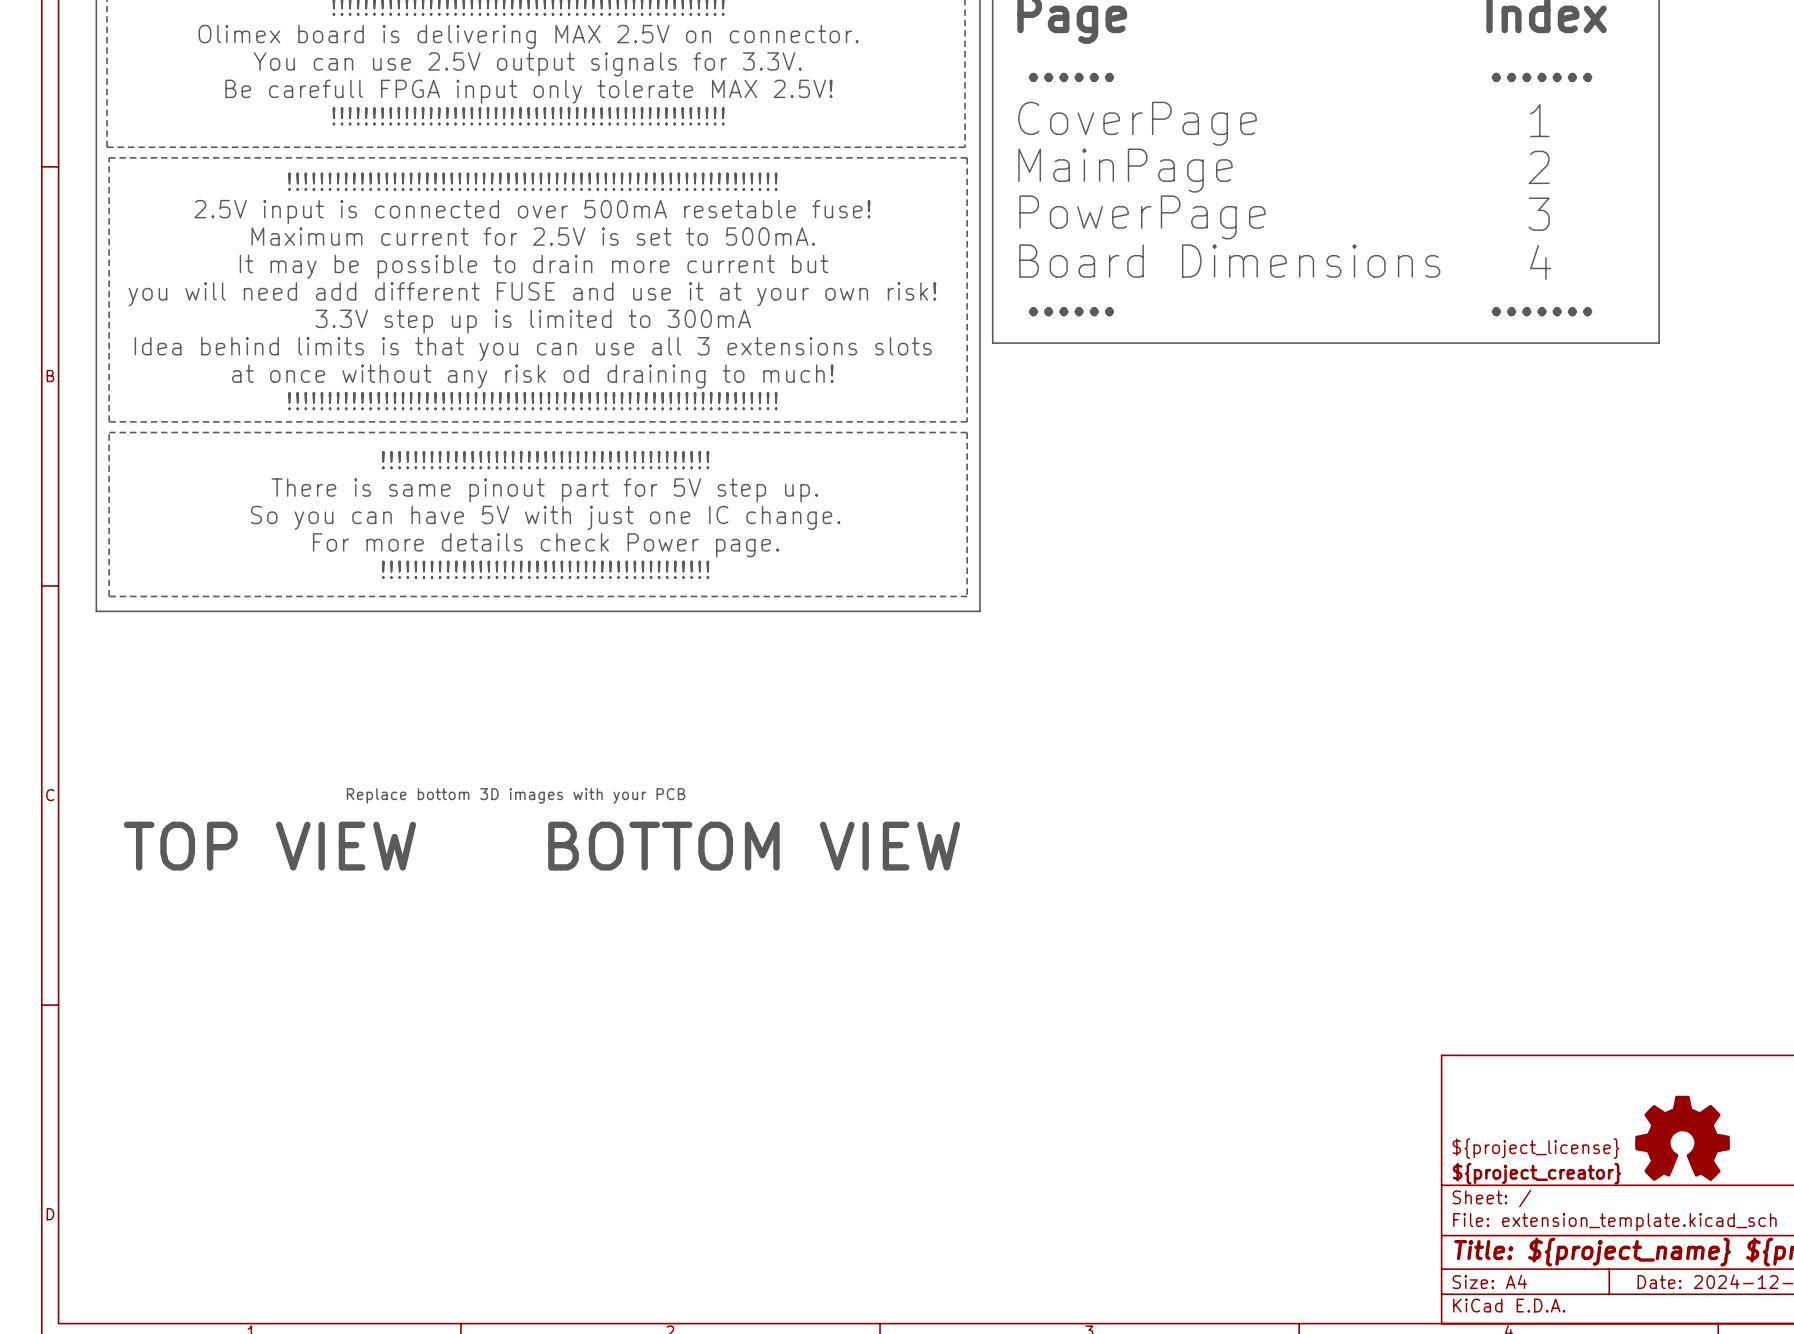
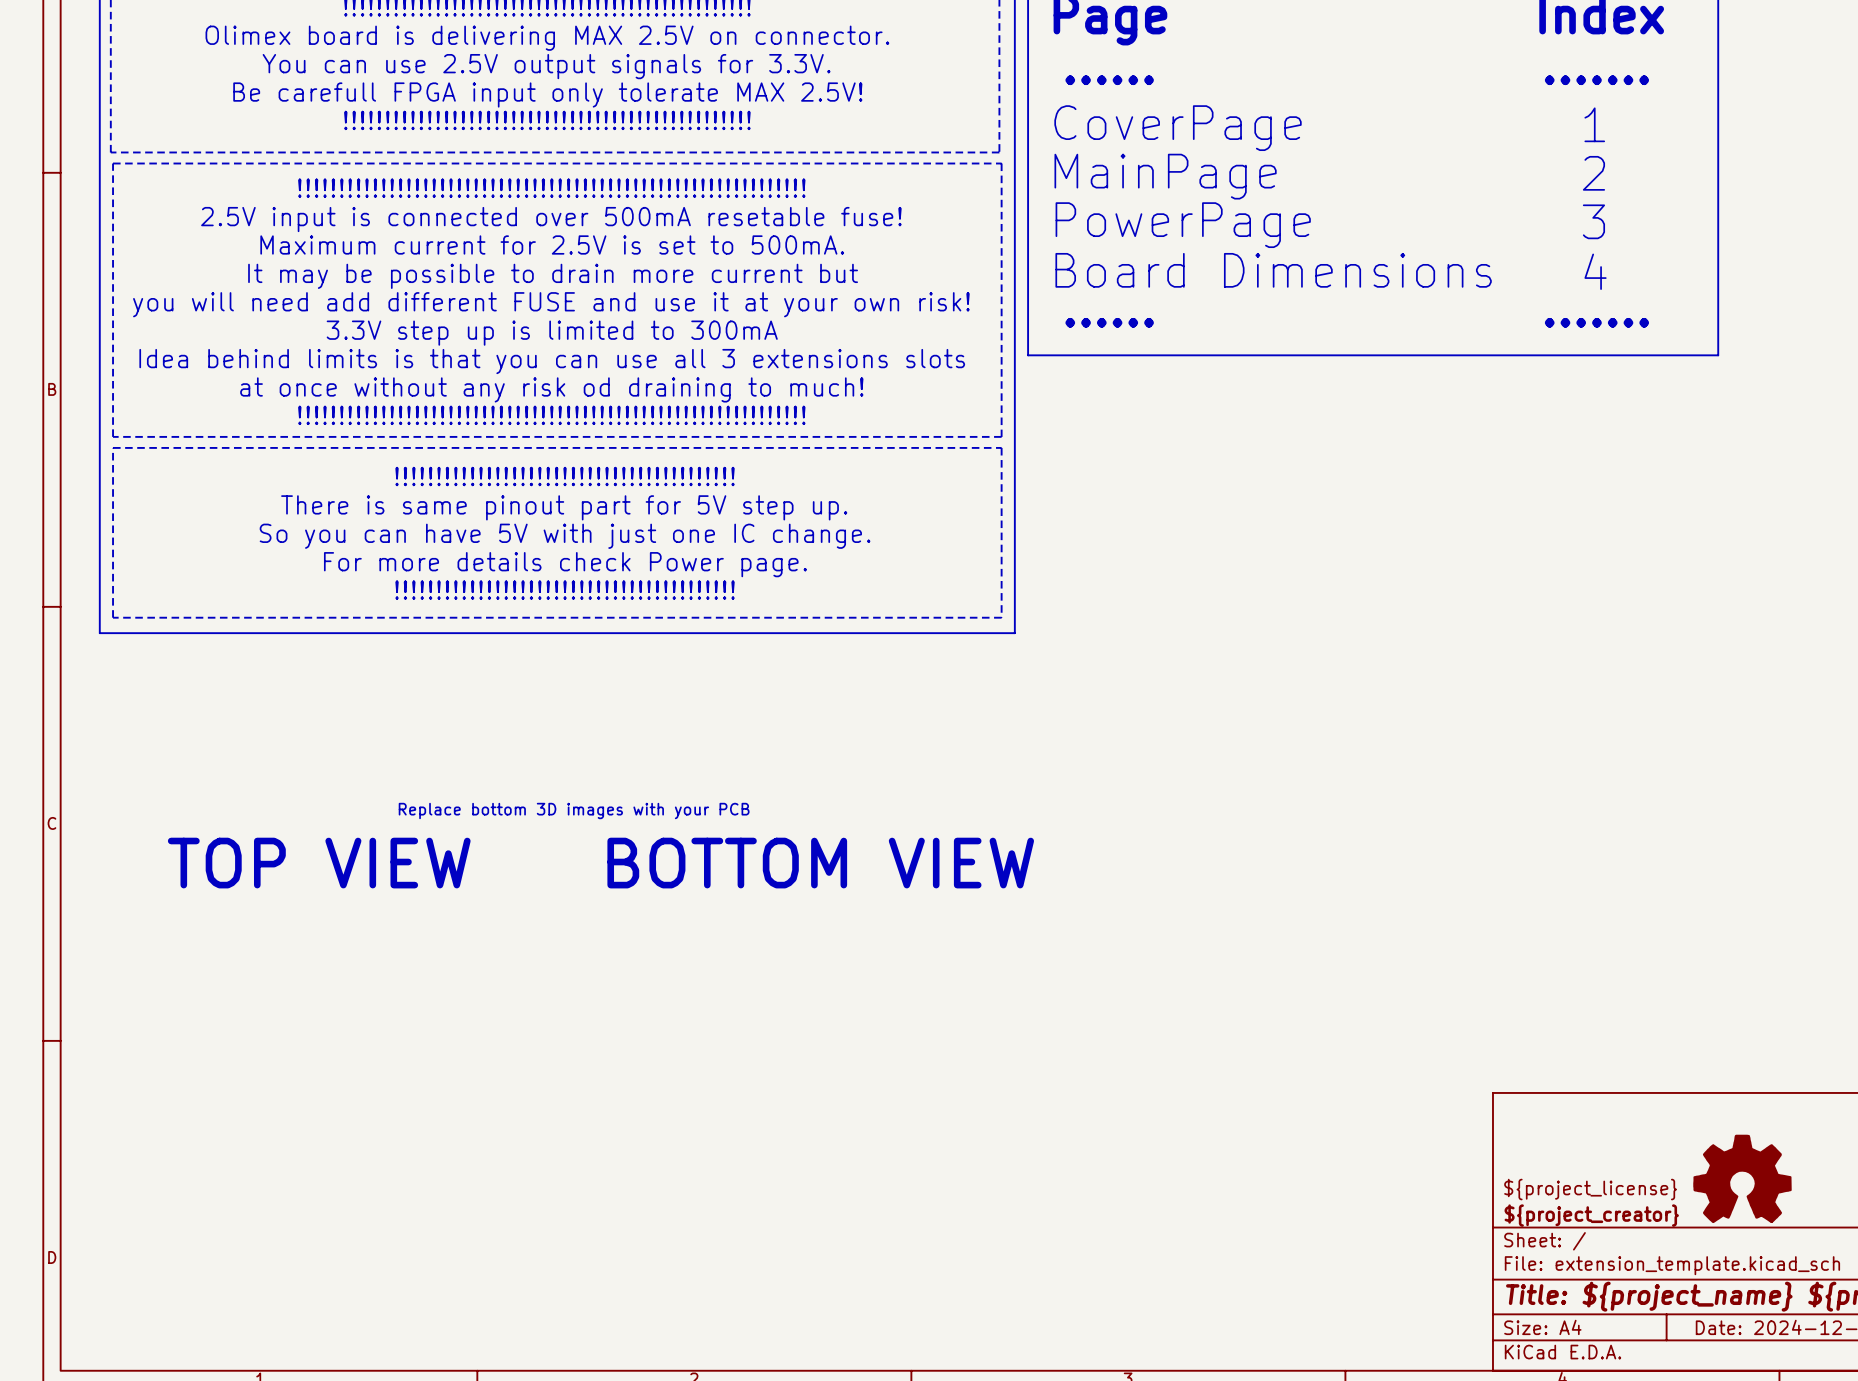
text position: Replace bottom 3D images with your PCB (516, 795) -> Replace bottom 3D images with your PCB (574, 811)
text position: TOP VIEW (269, 846) -> TOP VIEW (319, 863)
text position: BOTTOM VIEW (754, 846) -> BOTTOM VIEW (820, 863)

